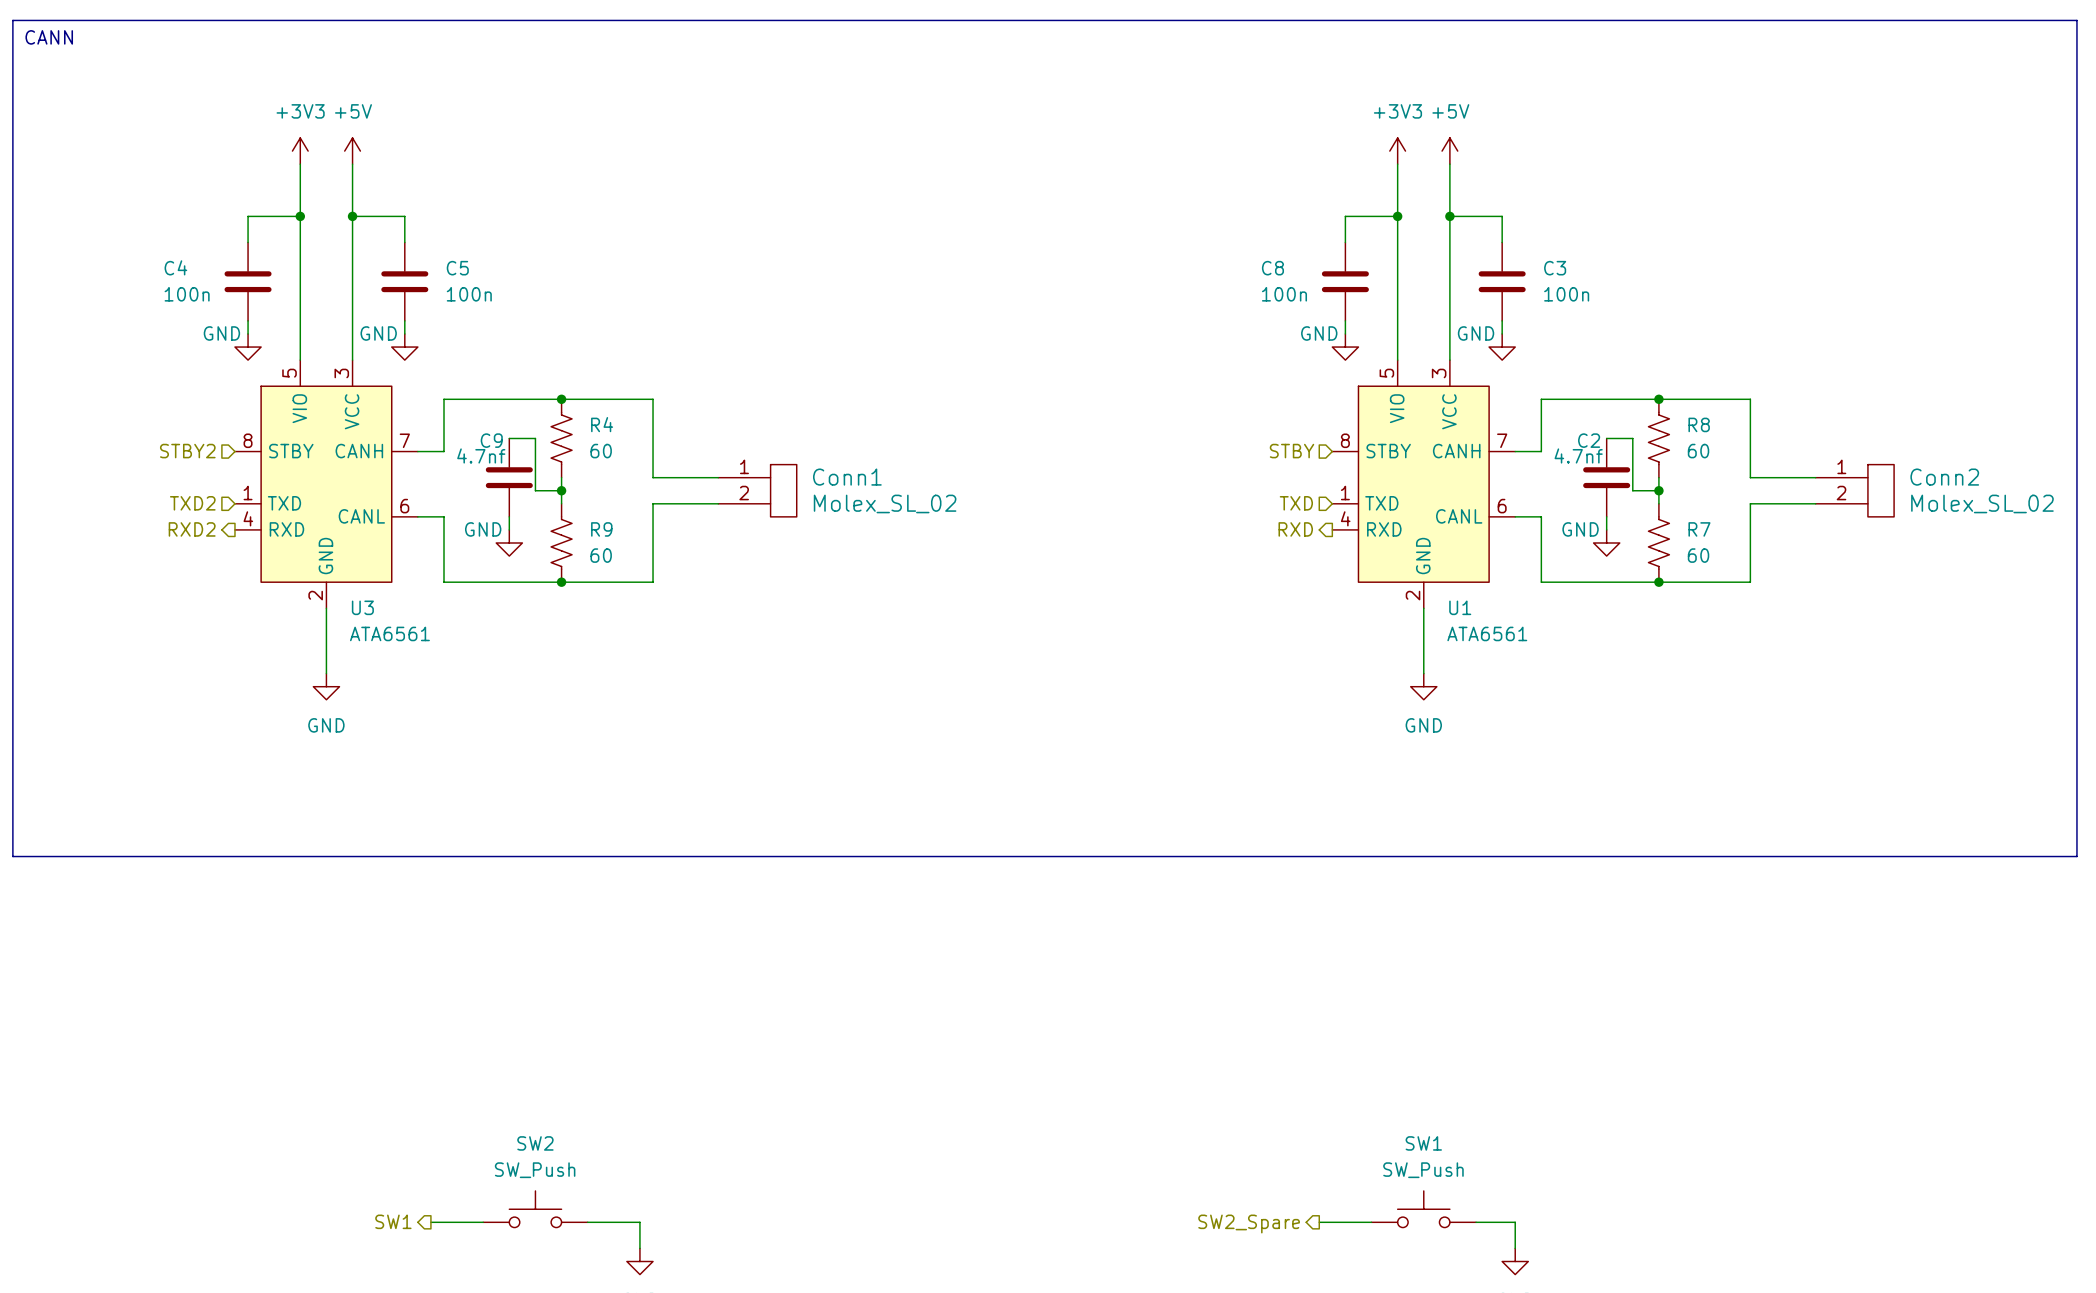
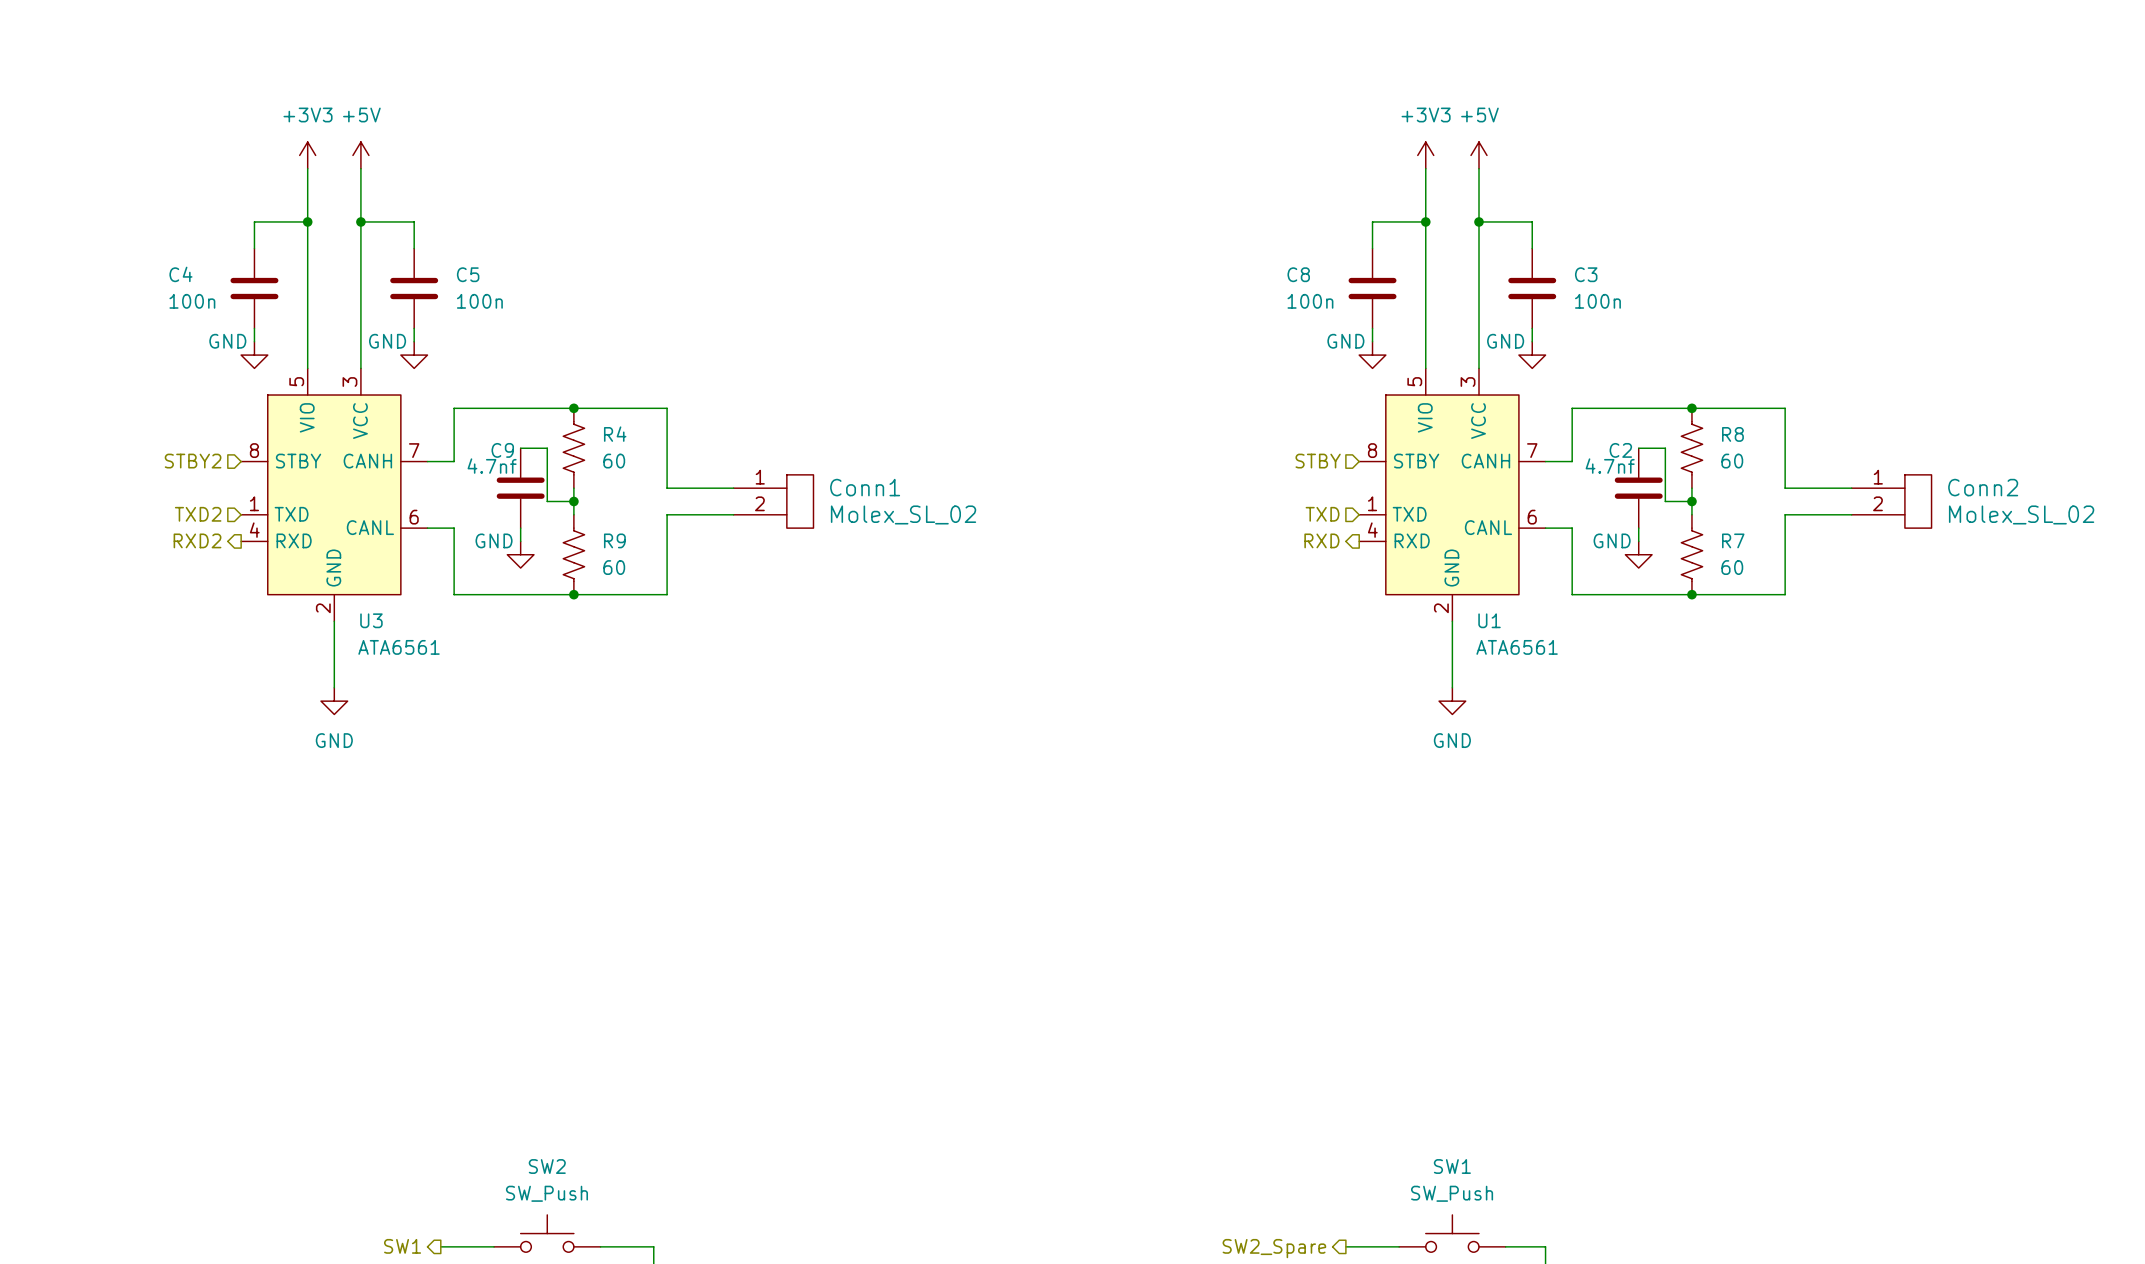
line: (12, 20) (2076, 20) (2076, 856) (12, 856) (12, 20) -> none
text: CANN (49, 37) -> none

